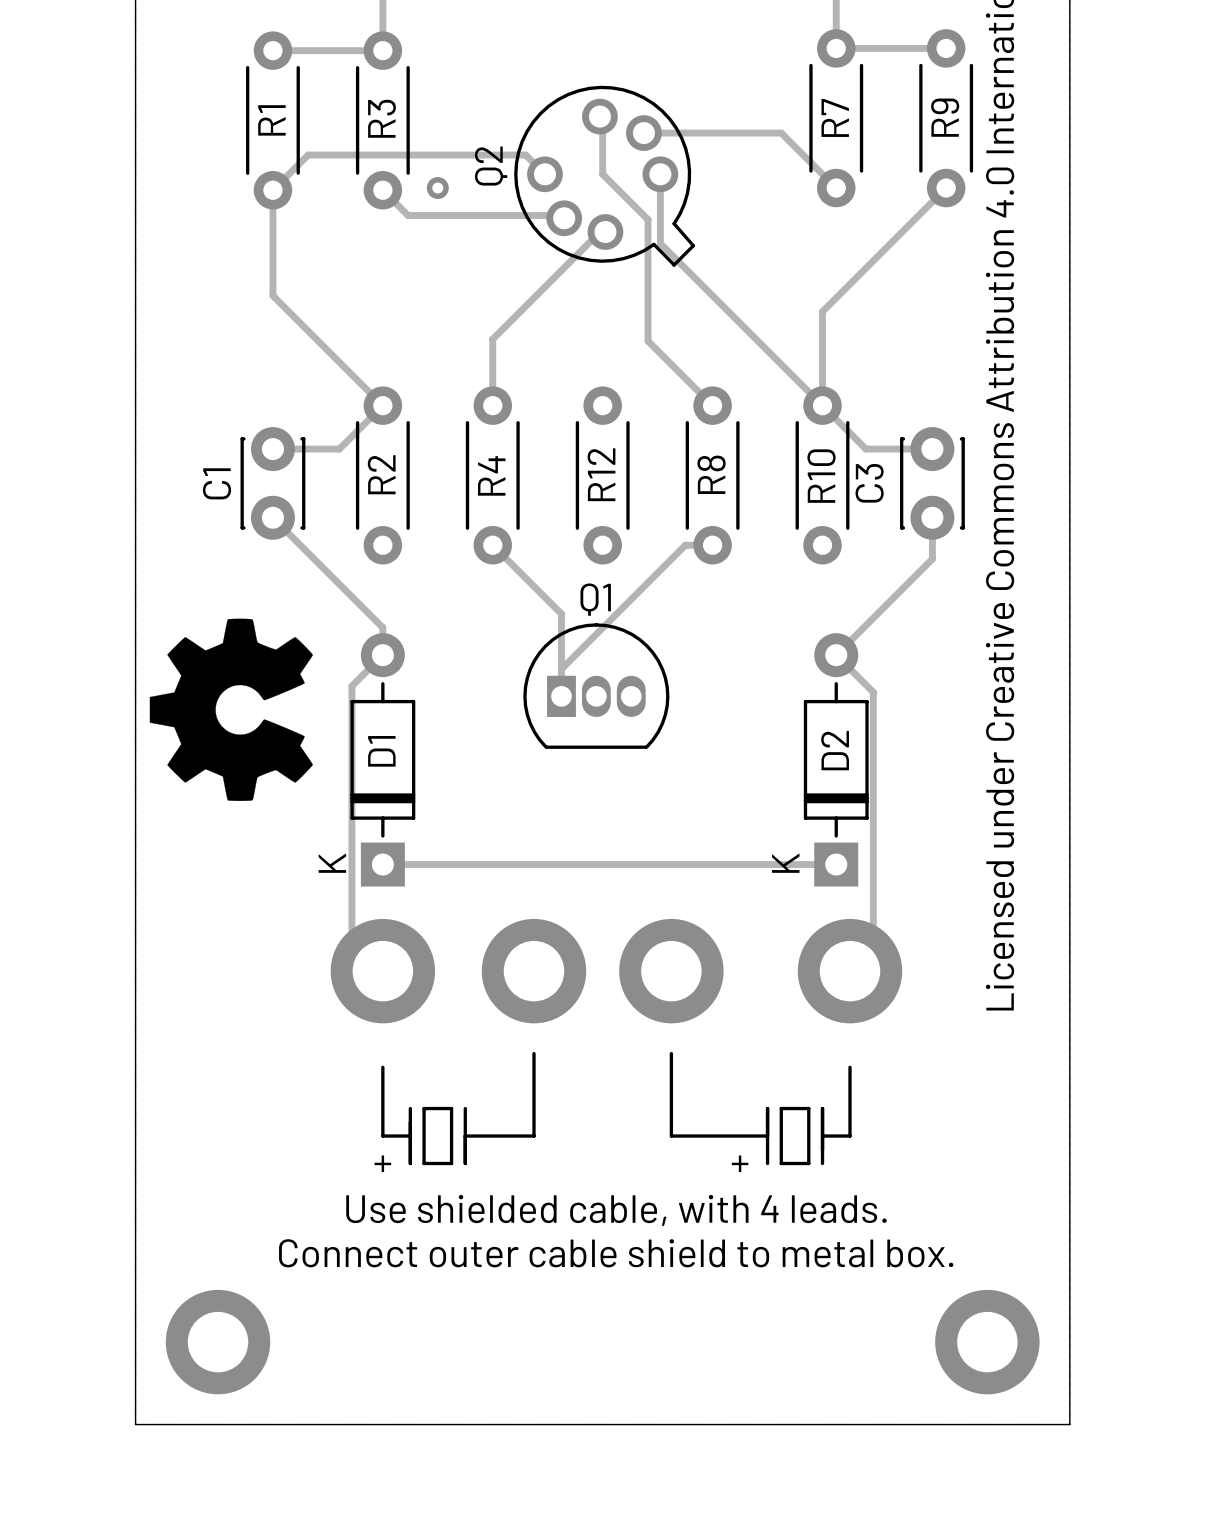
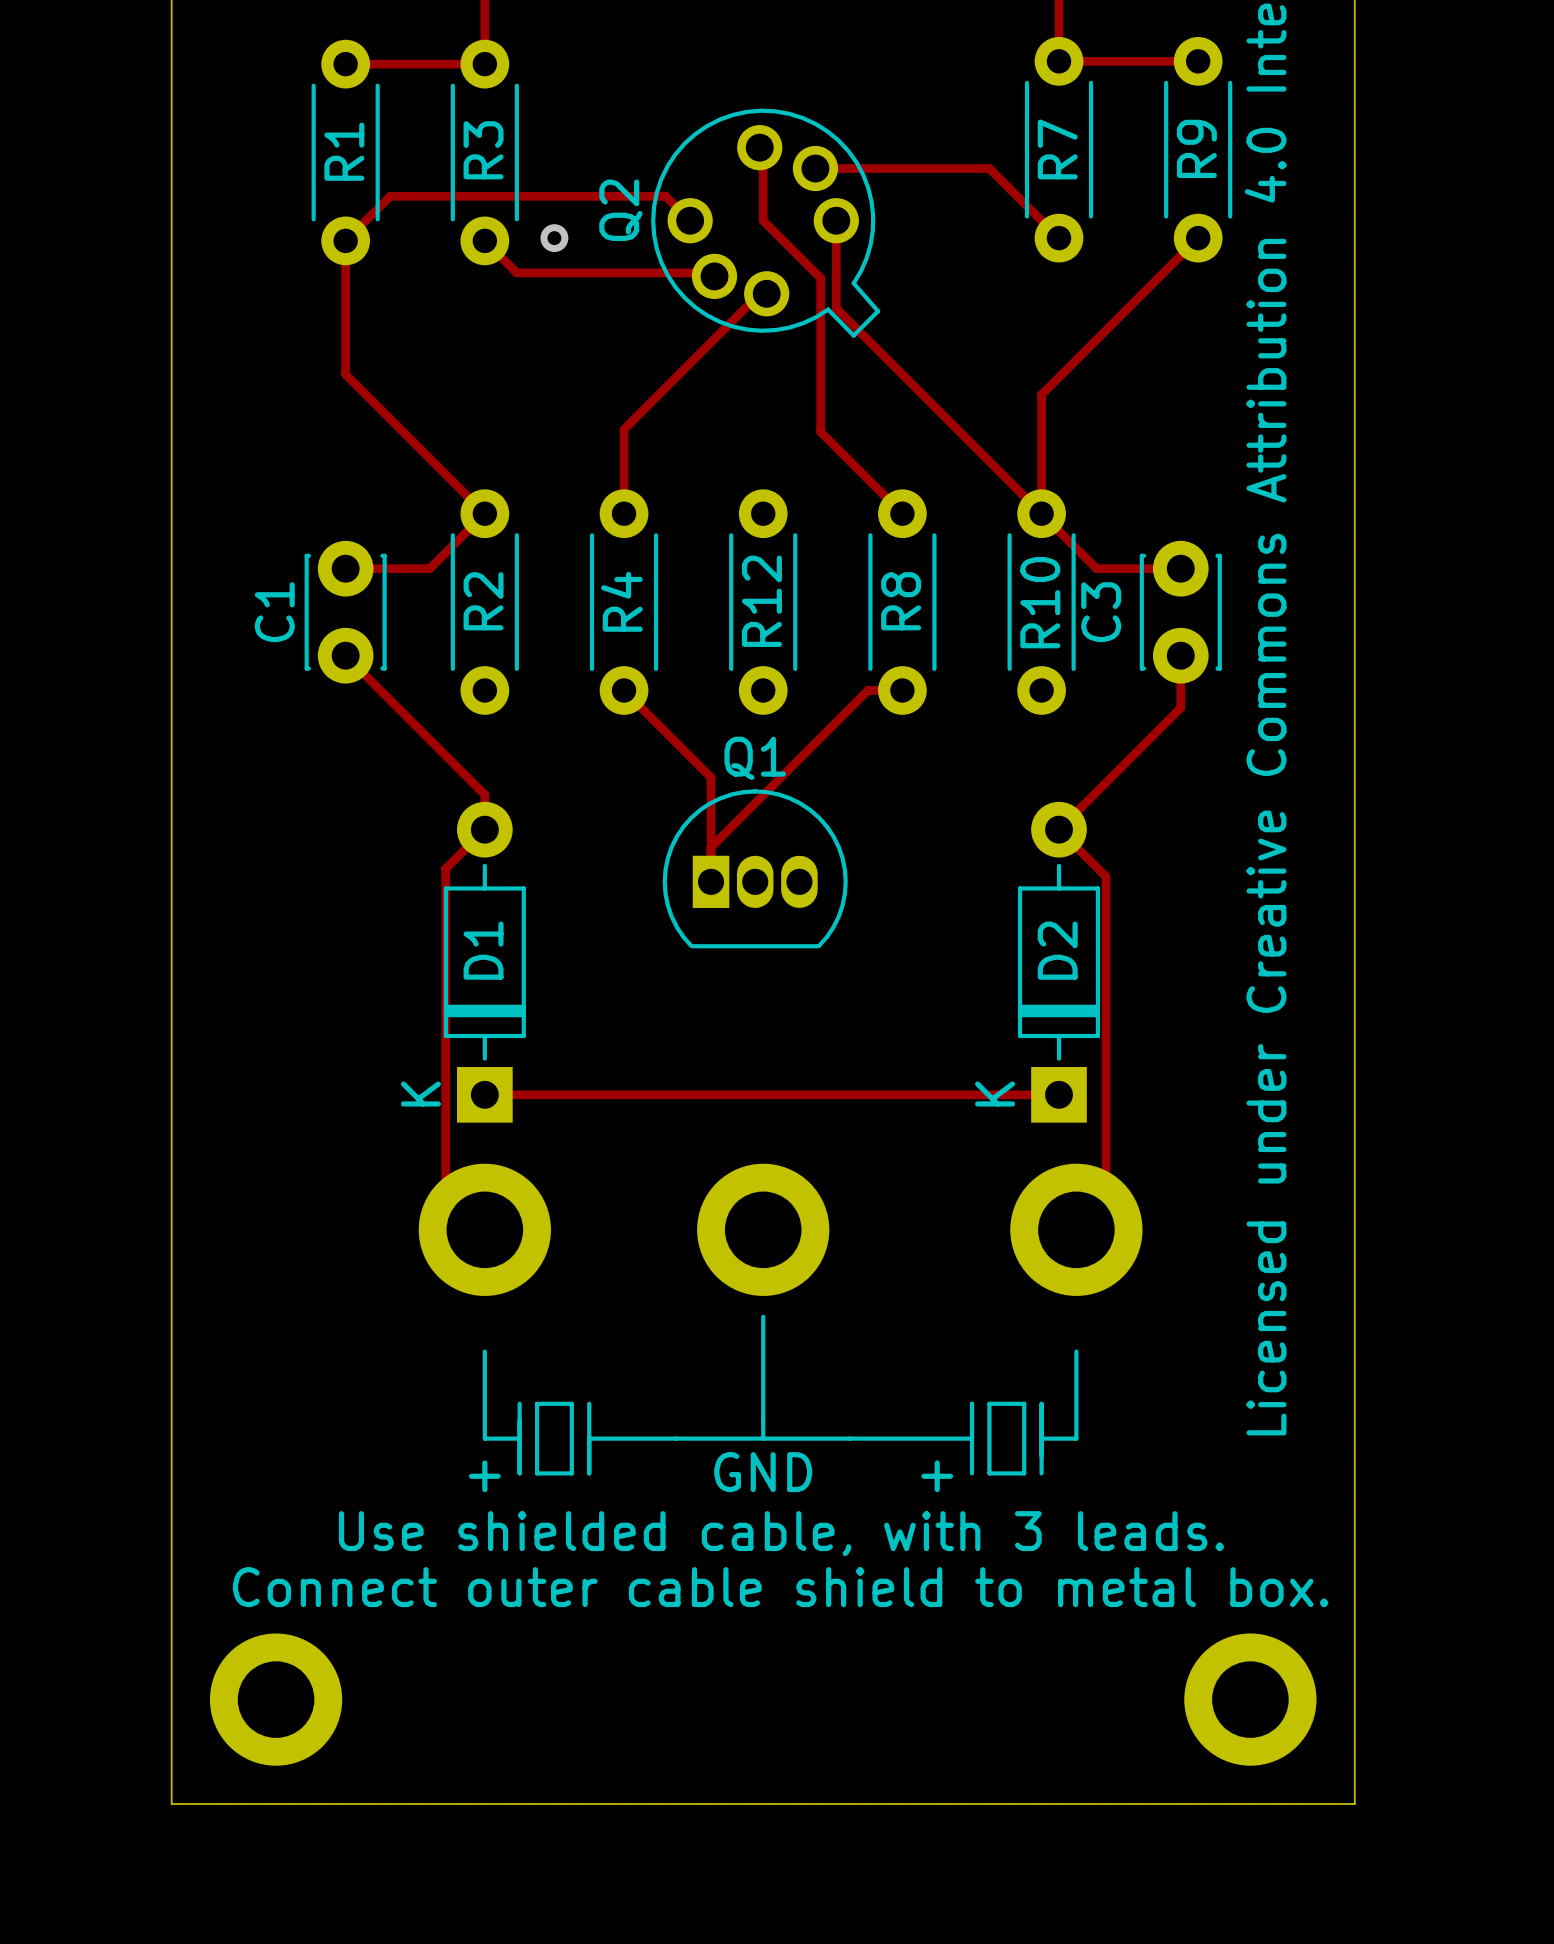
drawing: [149, 618, 313, 801] -> none
part: (533, 971) -> none
part: none -> (763, 1229)
part: (671, 971) -> none
line: none -> (763, 1316) (763, 1438)
line: (533, 1053) (533, 1136) -> (850, 1438) (676, 1438)
line: (671, 1053) (671, 1136) -> none
text: none -> GND (763, 1472)
text: Use shielded cable, with 4 leads. (616, 1210) -> Use shielded cable, with 3 leads. (781, 1533)

